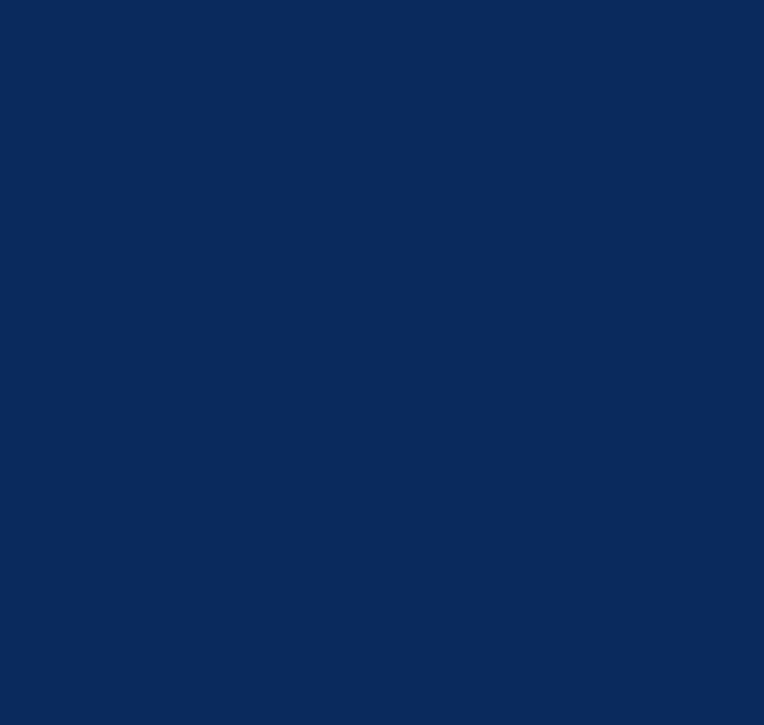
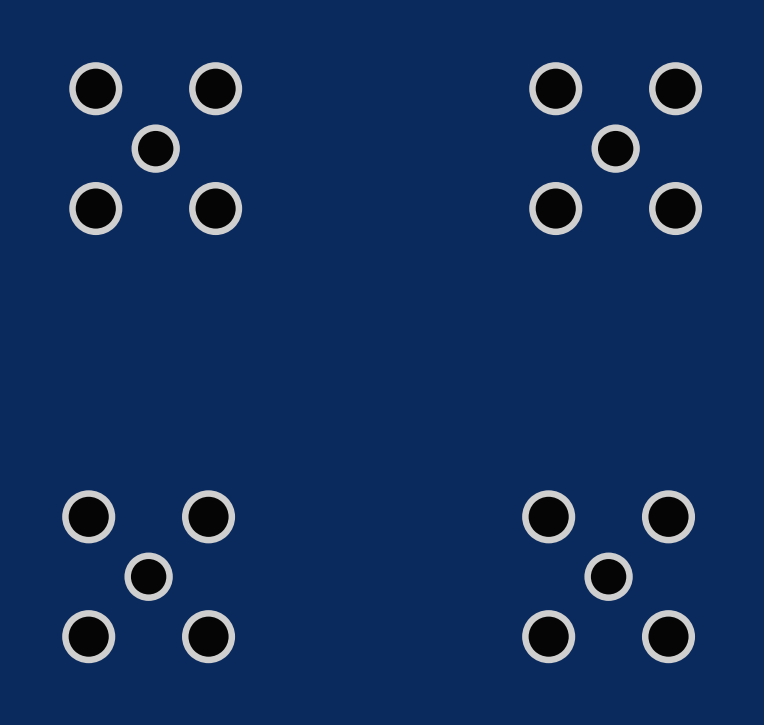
part: none -> (155, 148)
part: none -> (615, 148)
part: none -> (148, 576)
part: none -> (608, 576)

